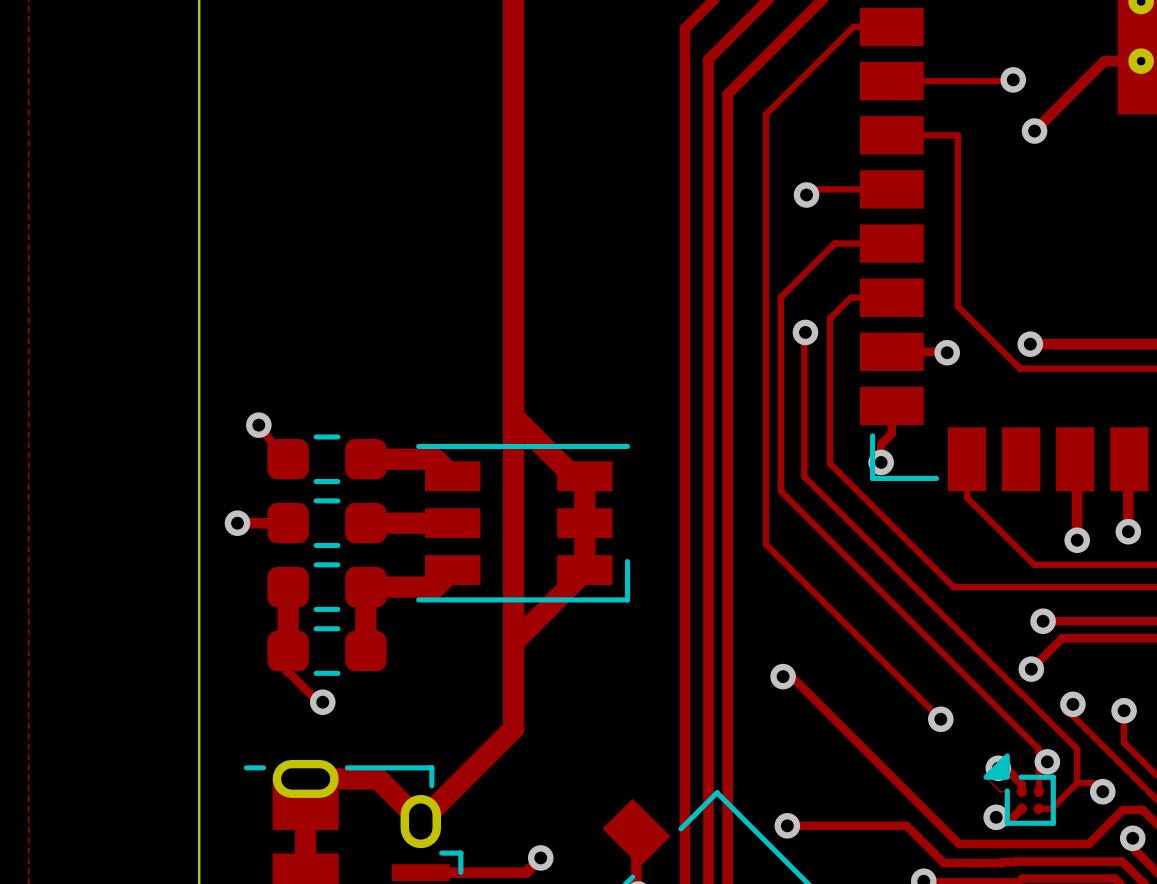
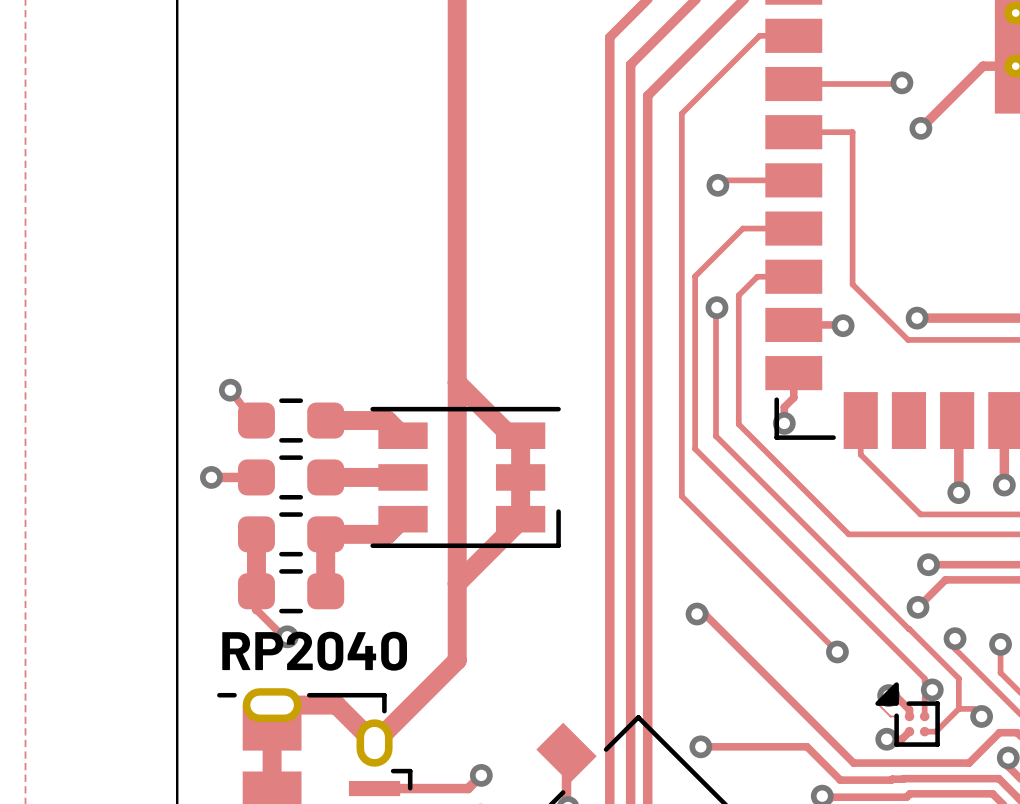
text: none -> RP2040 (314, 651)

